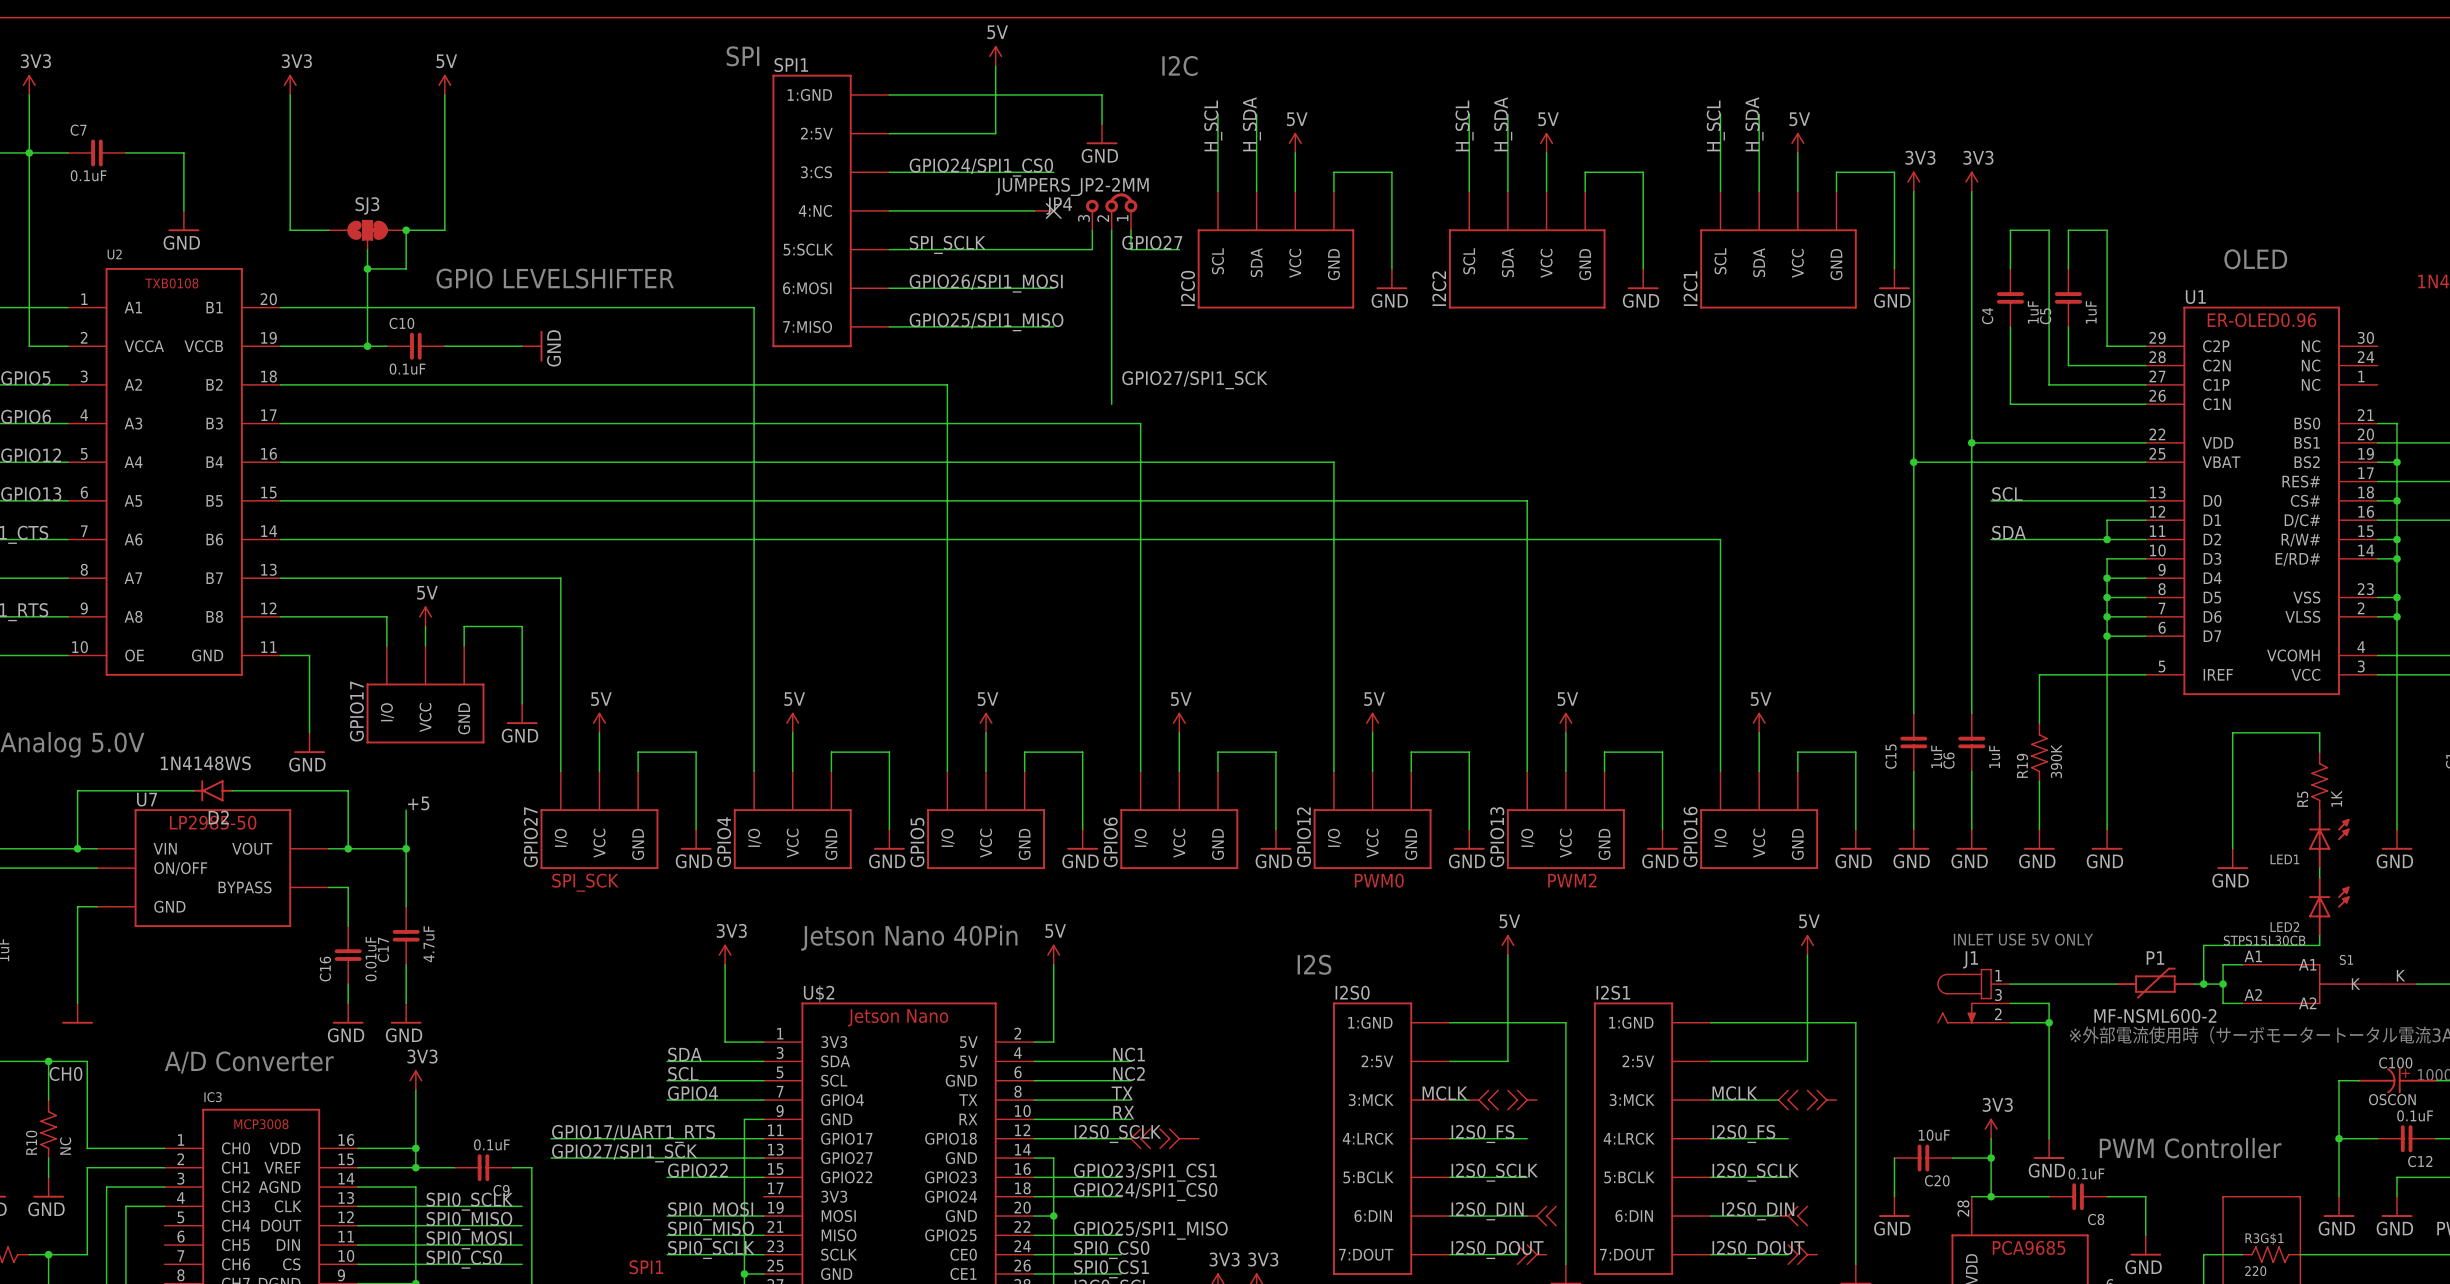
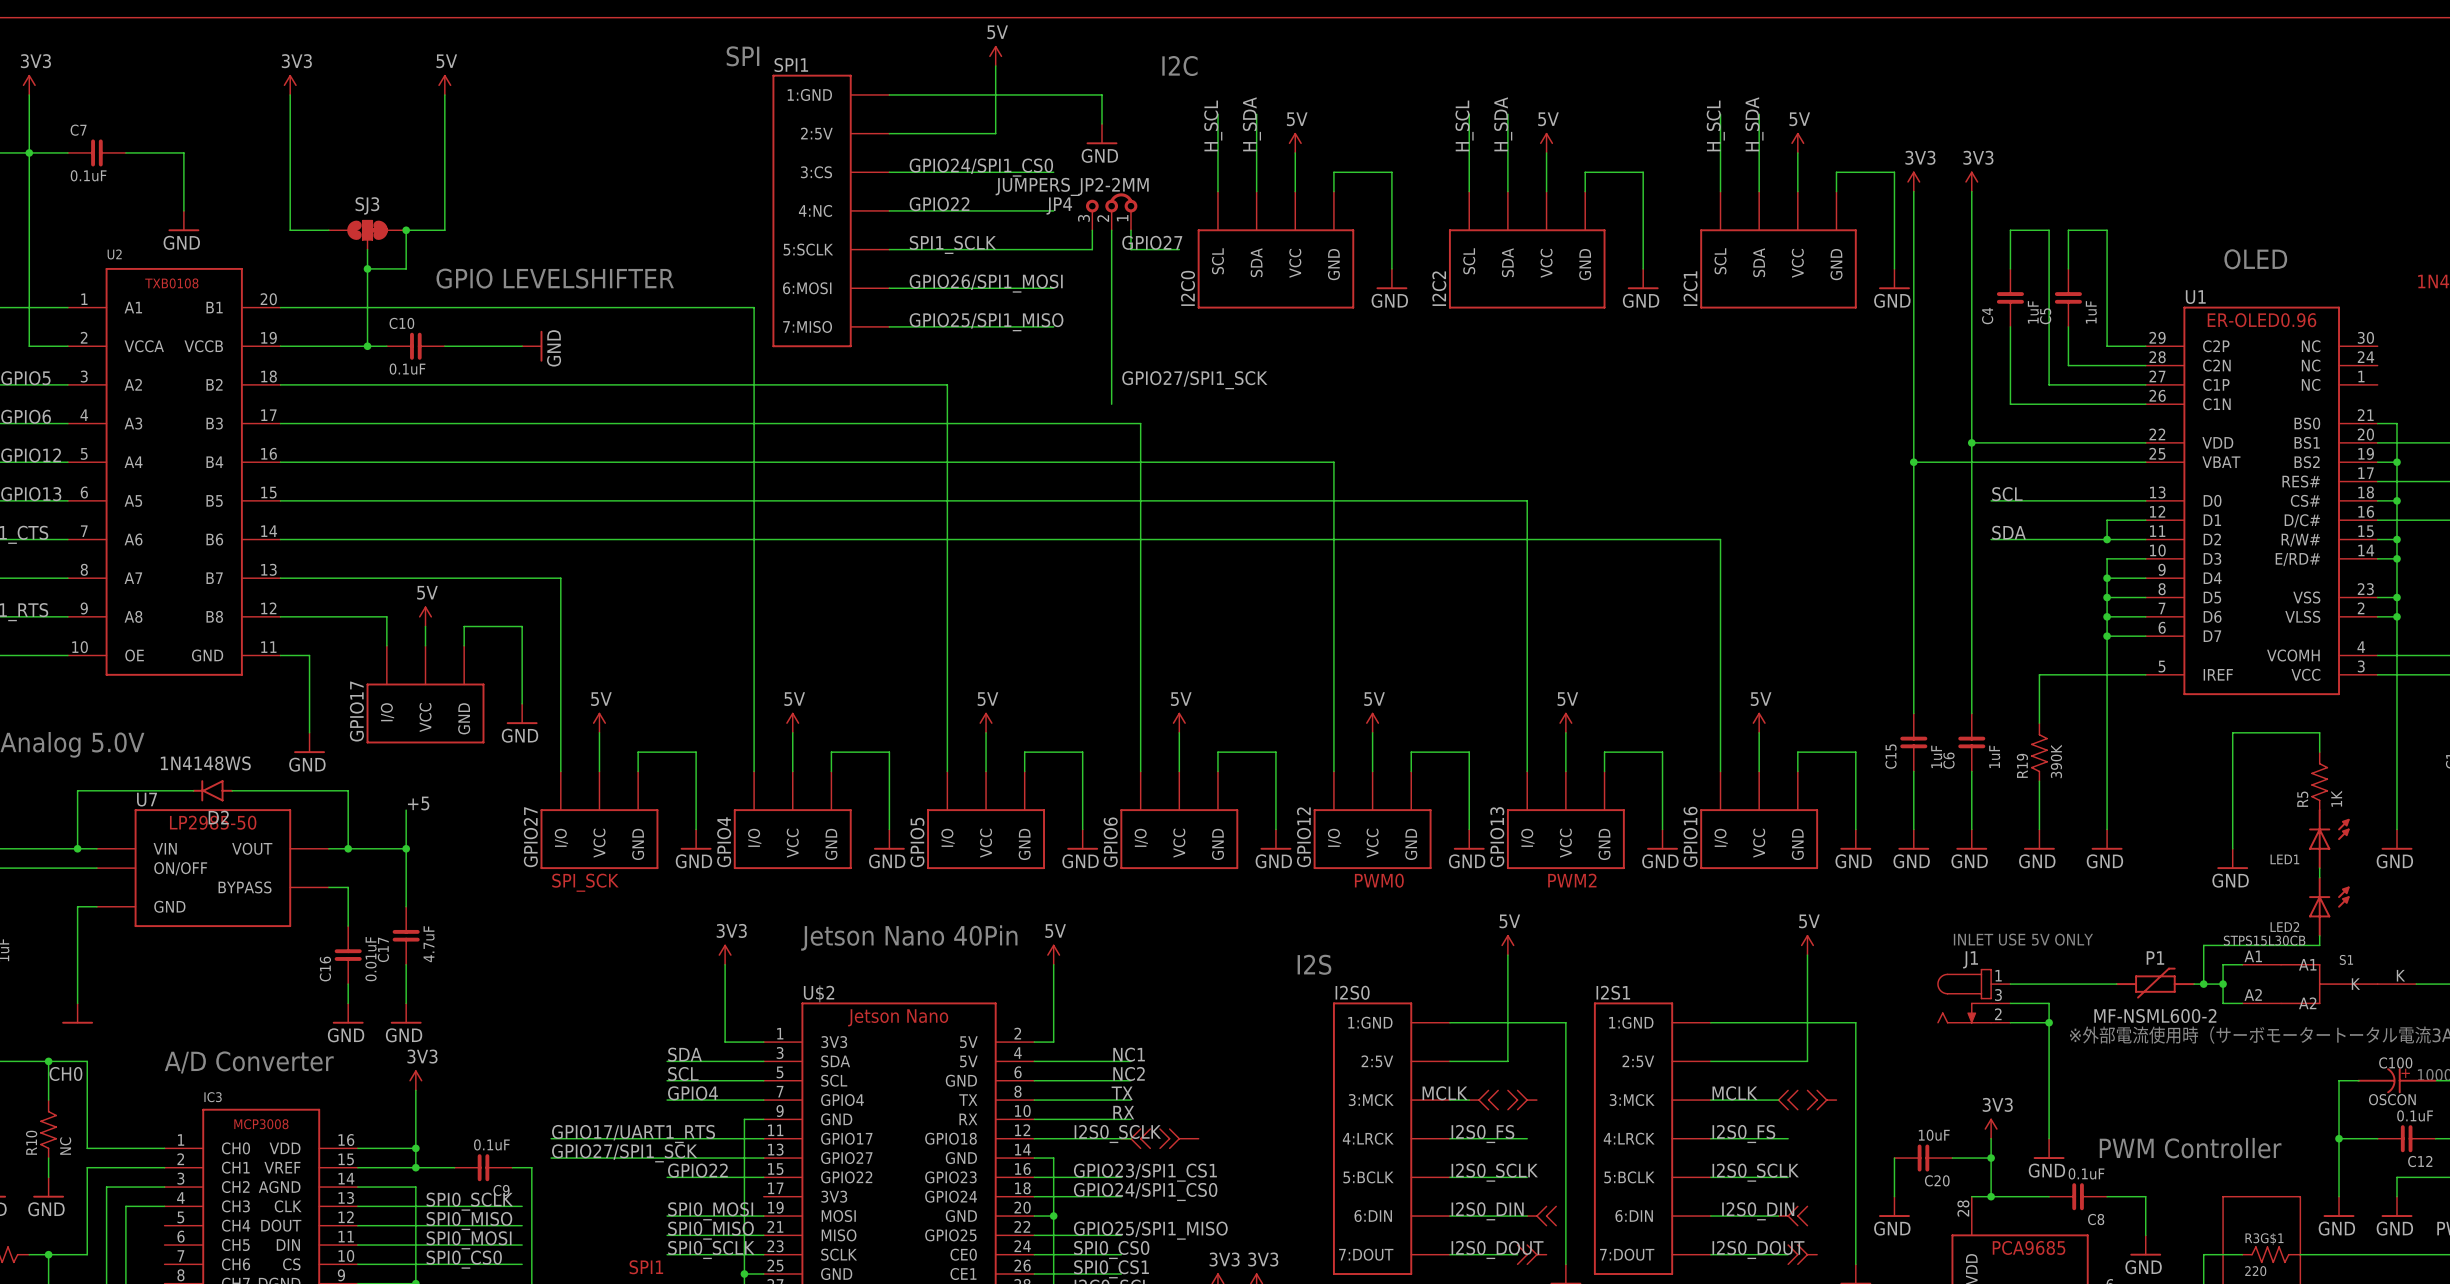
label: none -> GPIO22 (939, 204)
part: (1047, 210) -> none
label: SPI_SCLK (947, 244) -> SPI1_SCLK (952, 244)

